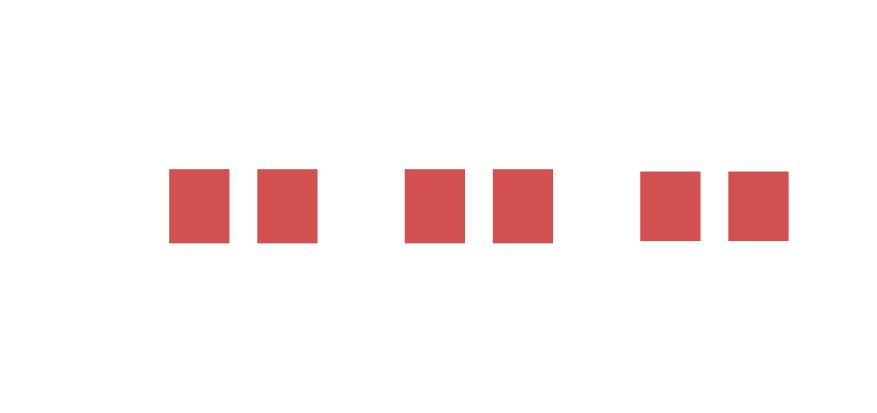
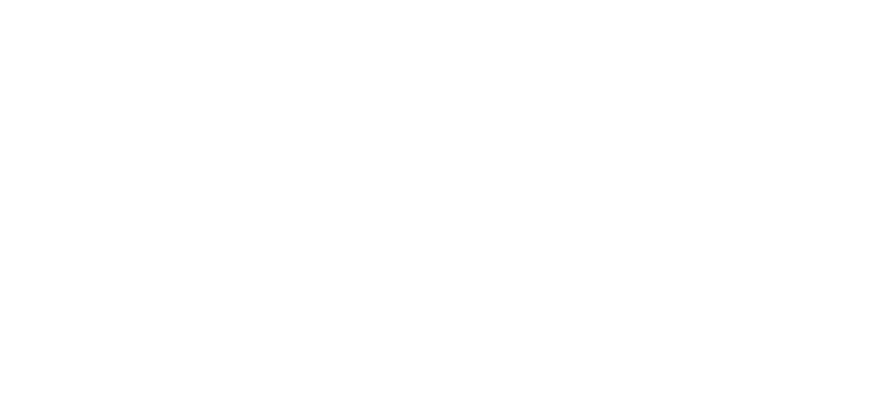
part: (243, 206) -> none
part: (478, 206) -> none
part: (714, 206) -> none

